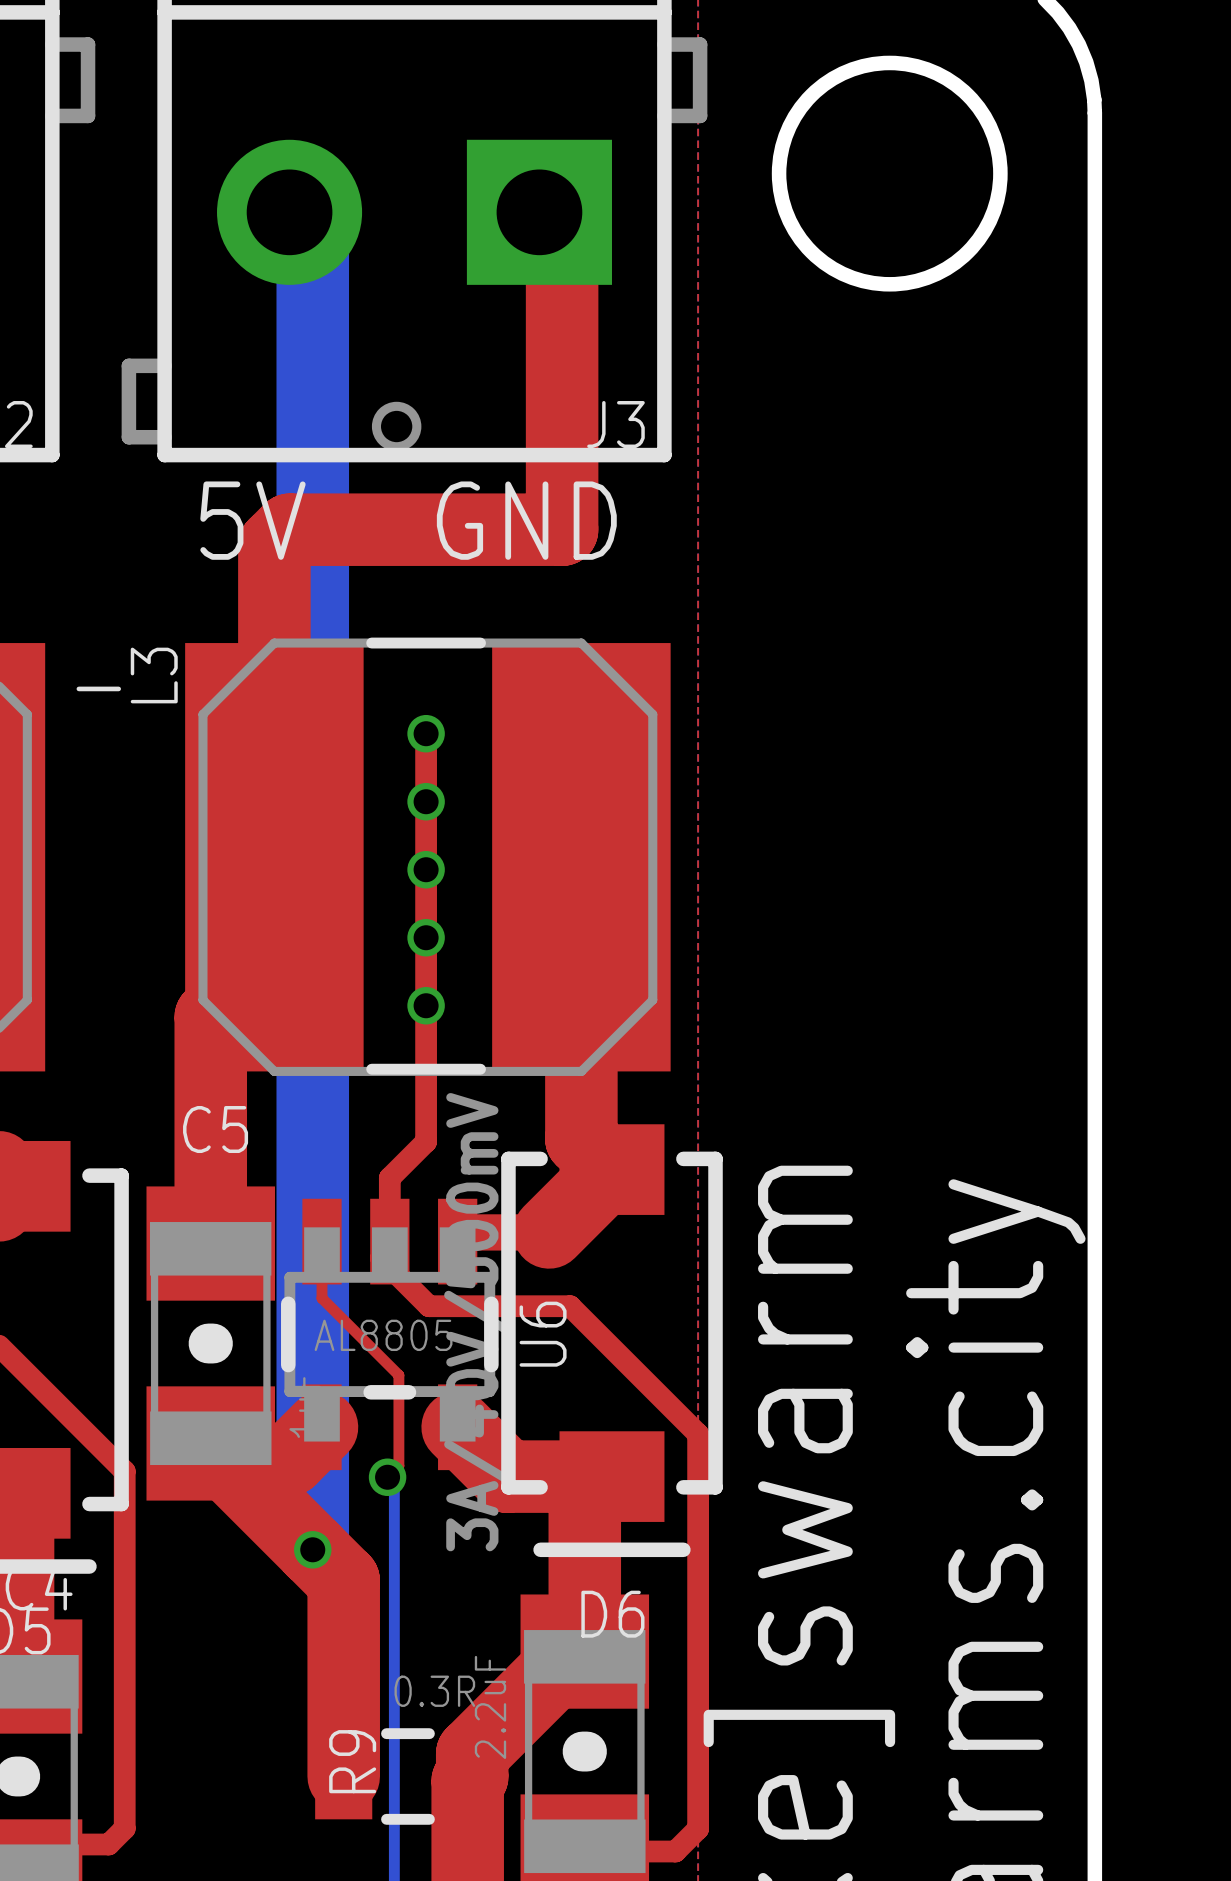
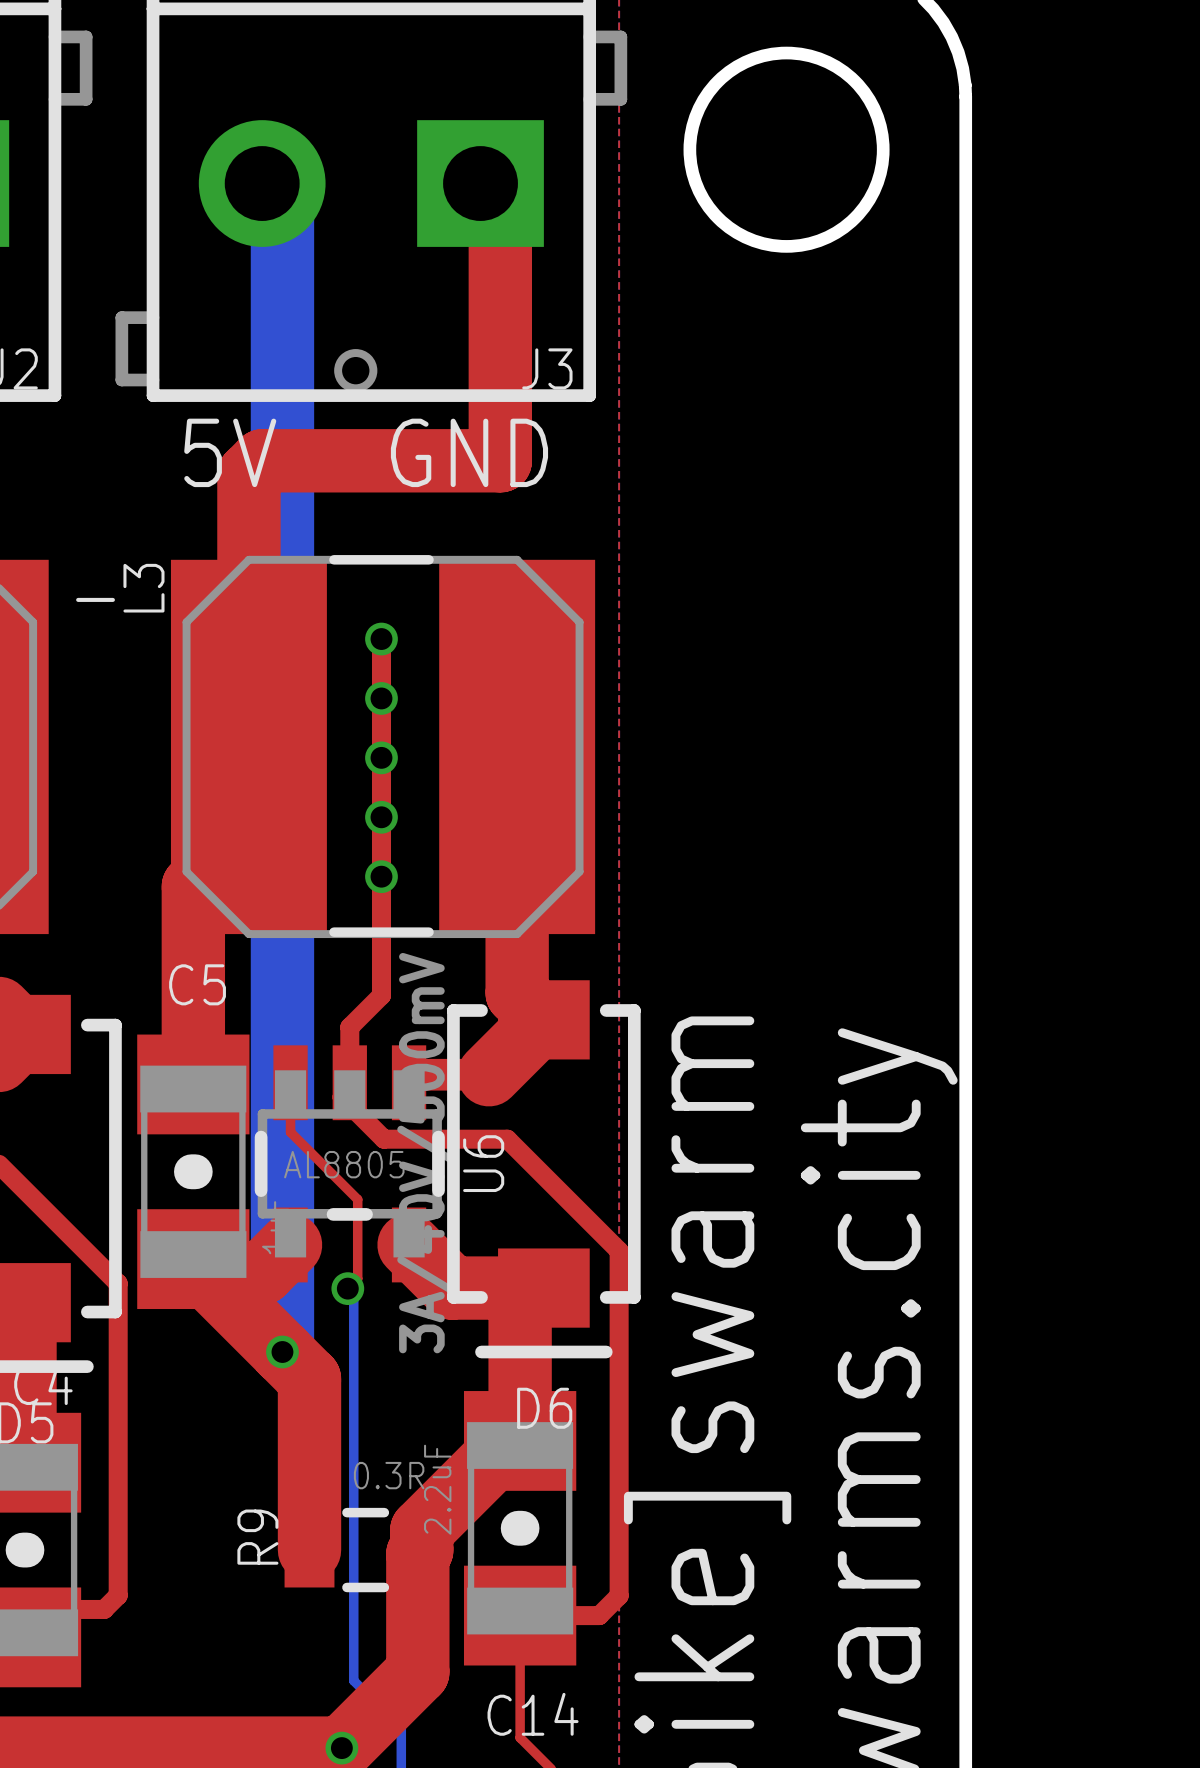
R9 name position: R9 (352, 1761) -> R9 (257, 1537)

